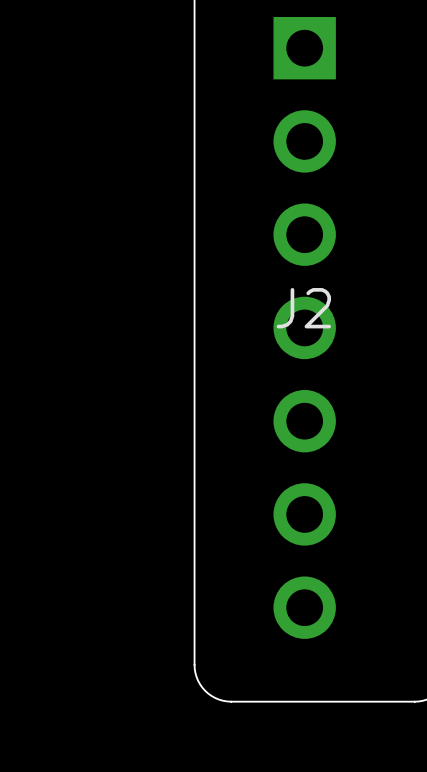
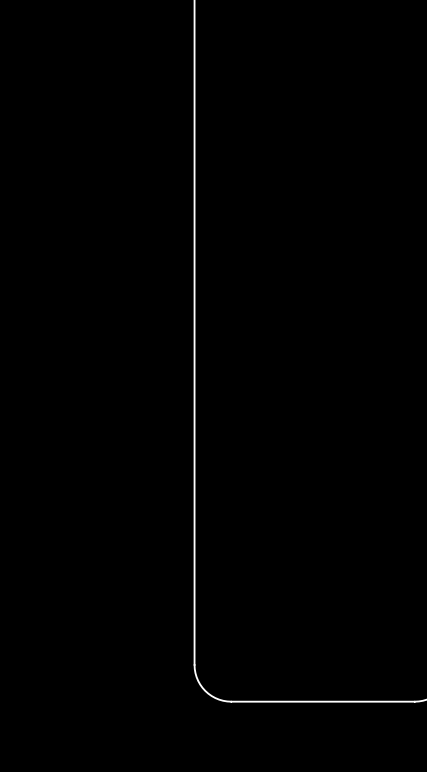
J2: (304, 327) -> none

